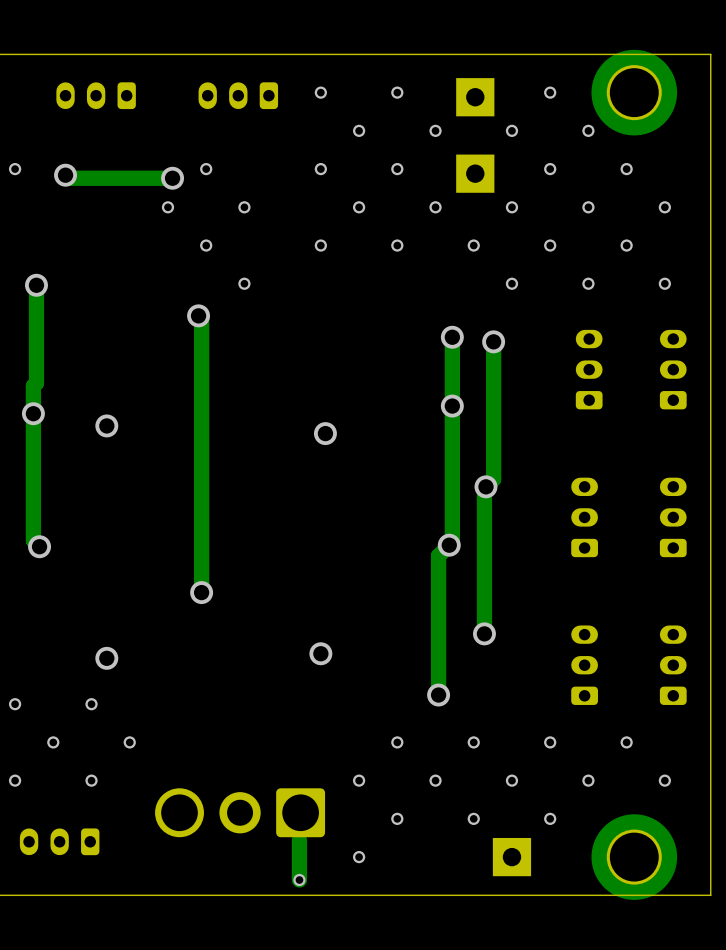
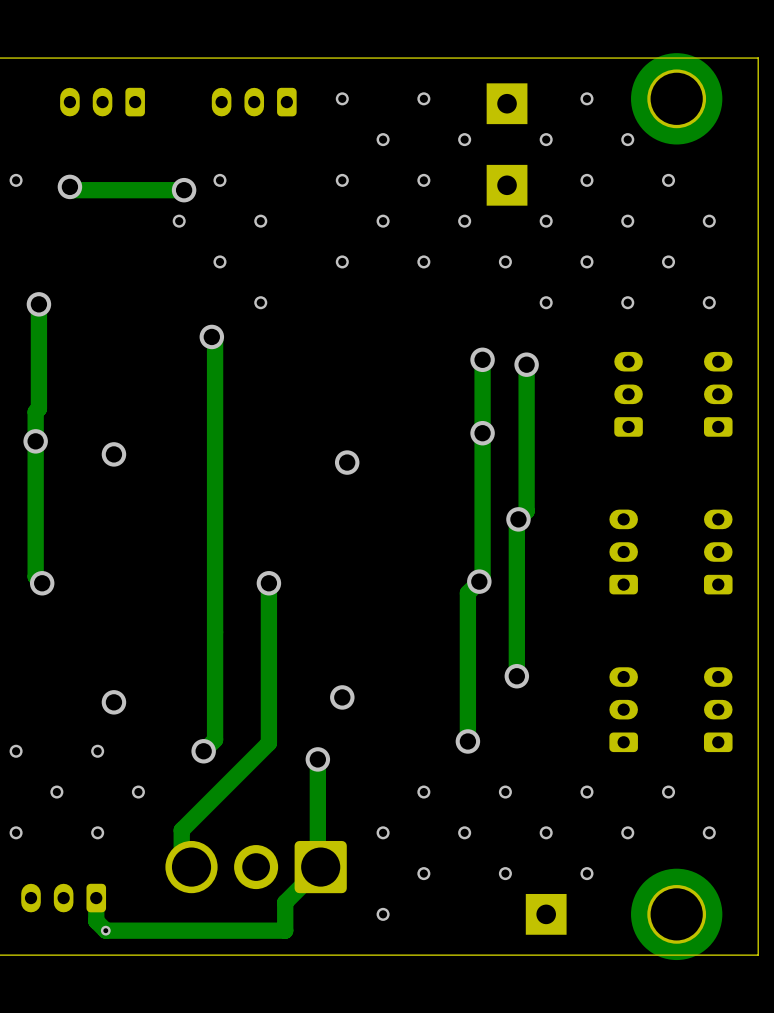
track: none -> (268, 583) (268, 743) (181, 830) (181, 857) (191, 867)
via: none -> (268, 583)
track: none -> (215, 632) (215, 739) (203, 751)
via: (201, 592) -> none
via: none -> (203, 751)
track: none -> (317, 759) (317, 864) (320, 867) (285, 902) (285, 930) (105, 930) (96, 921) (96, 898)
via: none -> (317, 759)
track: (299, 840) (299, 880) -> none
via: none -> (105, 930)
via: (299, 880) -> none

